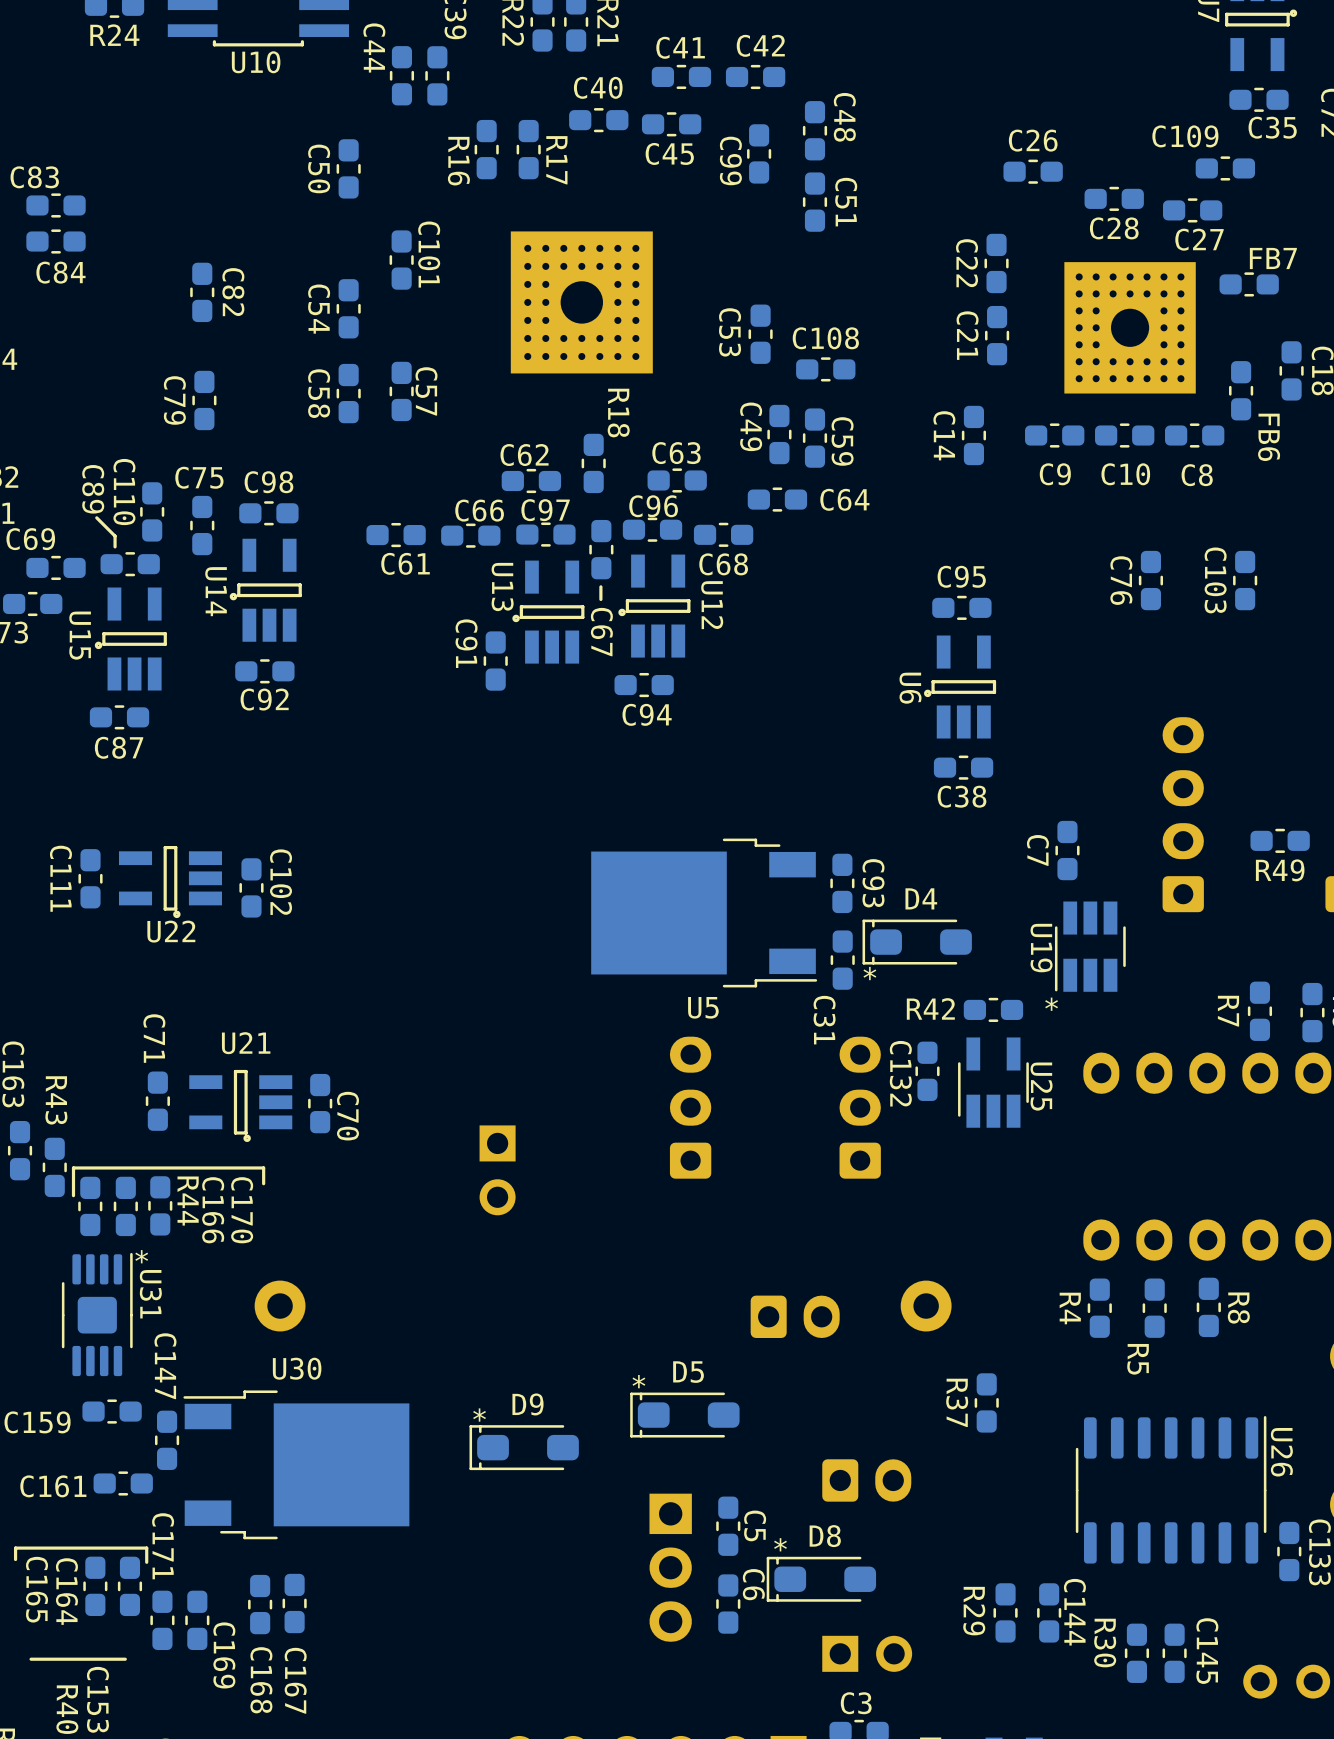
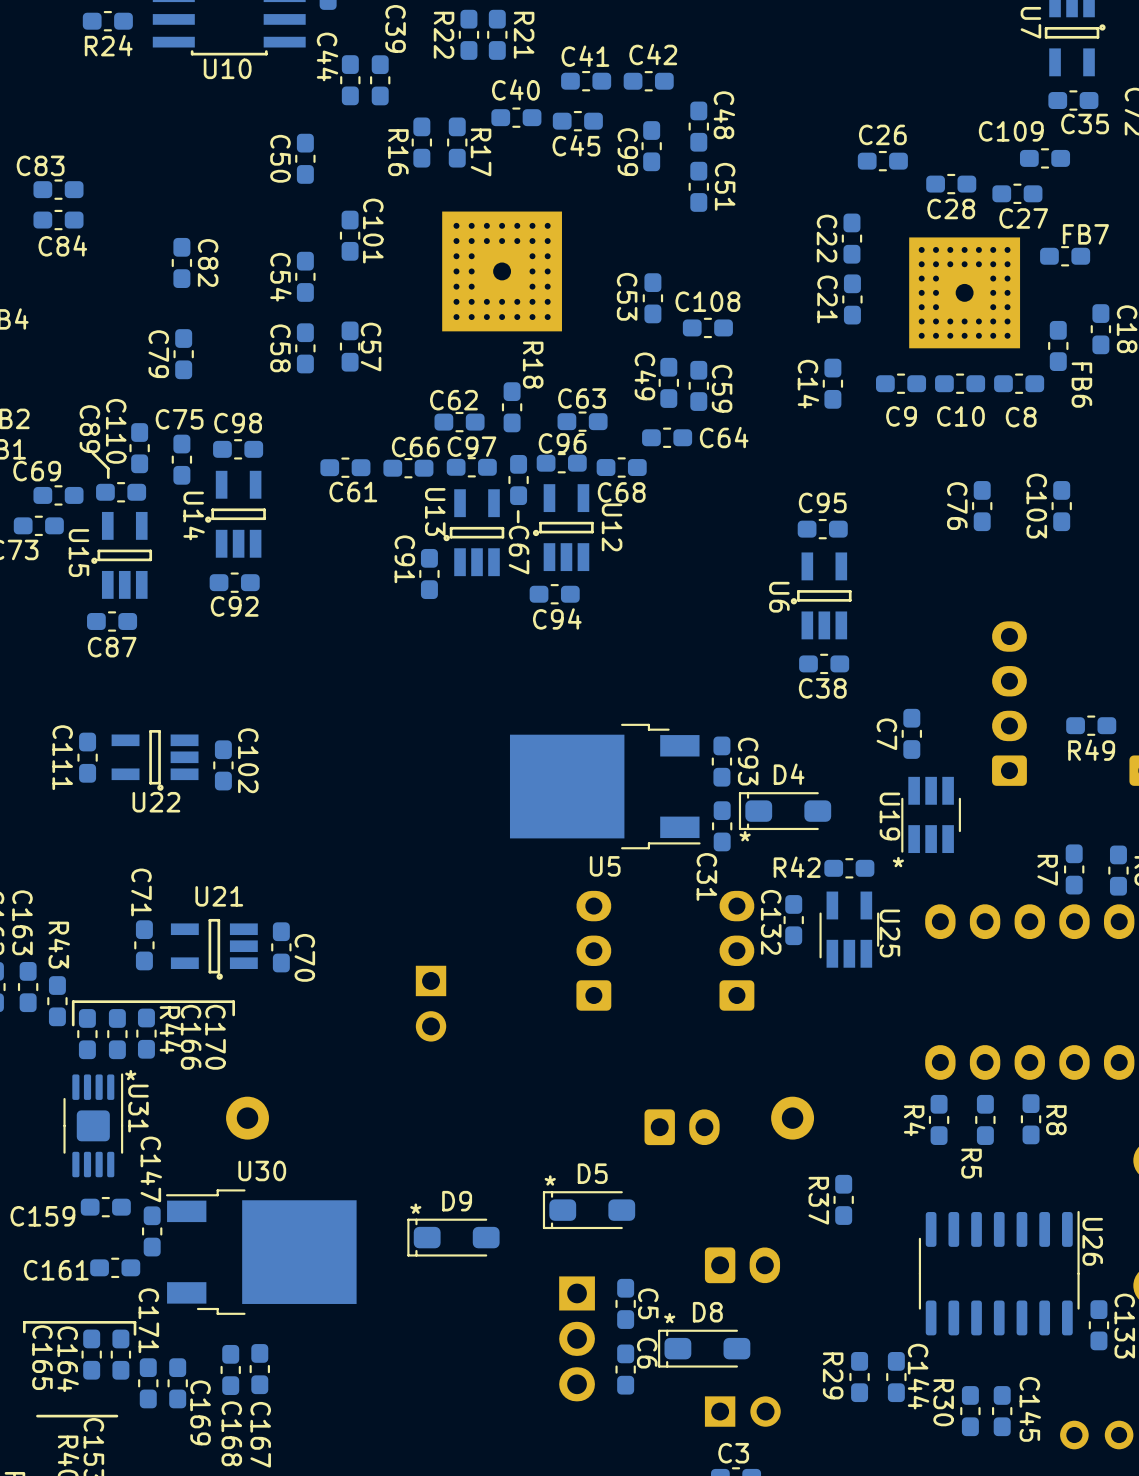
part footprint: [510, 231, 653, 374] -> [442, 211, 562, 332]
part footprint: [1064, 262, 1196, 394] -> [909, 237, 1021, 349]

